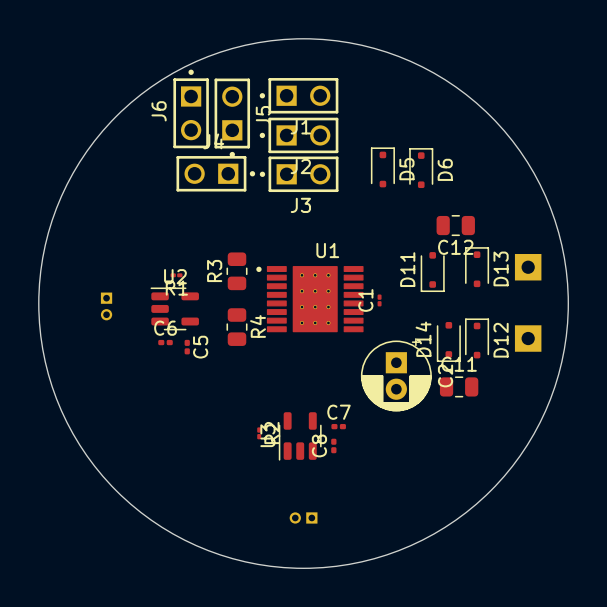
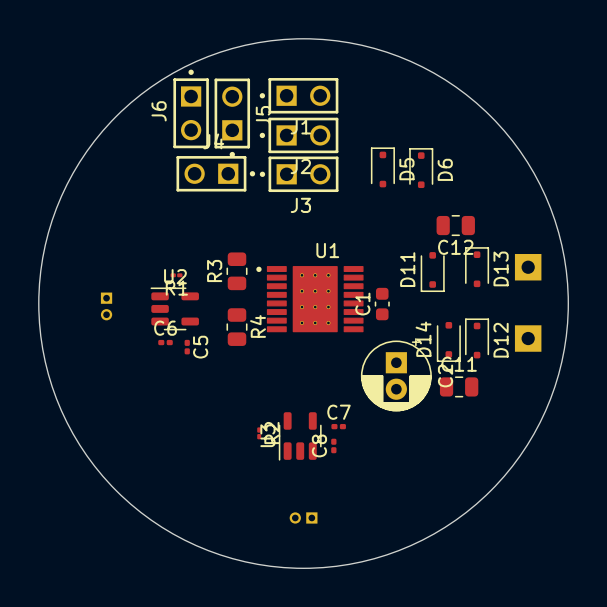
C1 footprint: [377, 294, 382, 307] -> [374, 287, 390, 321]

